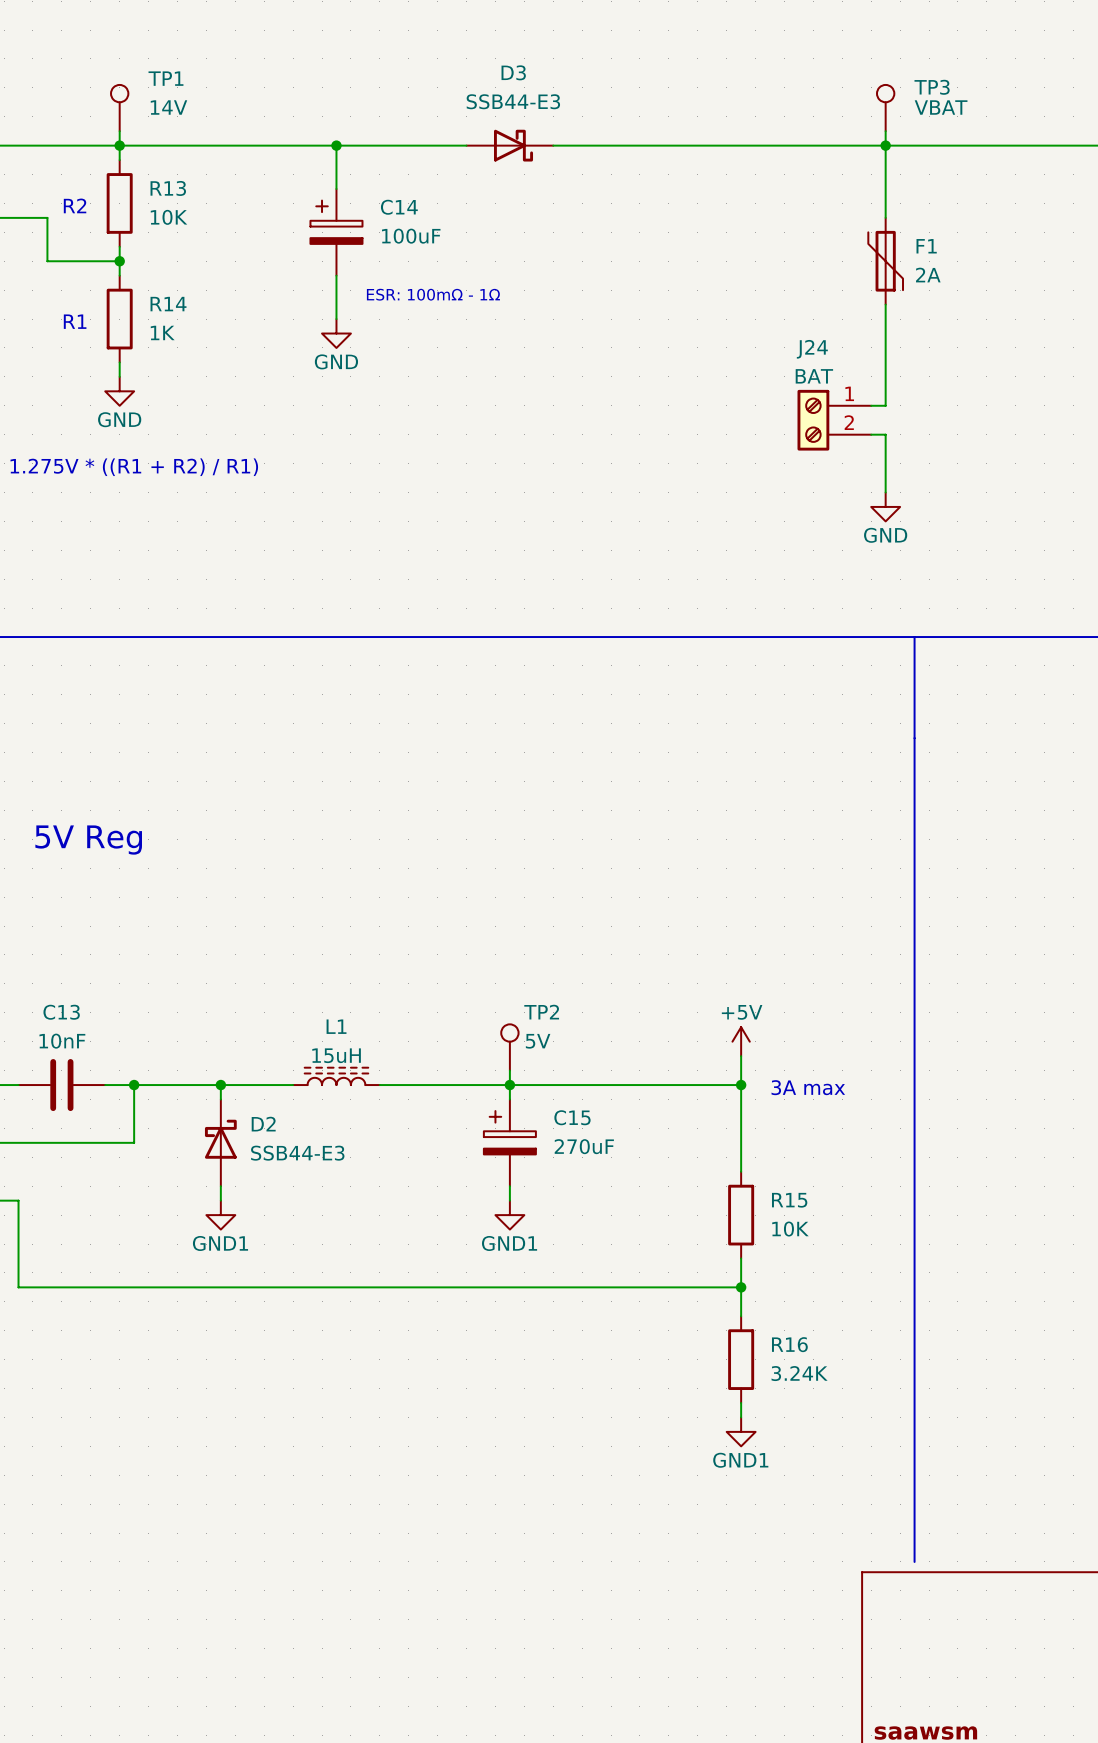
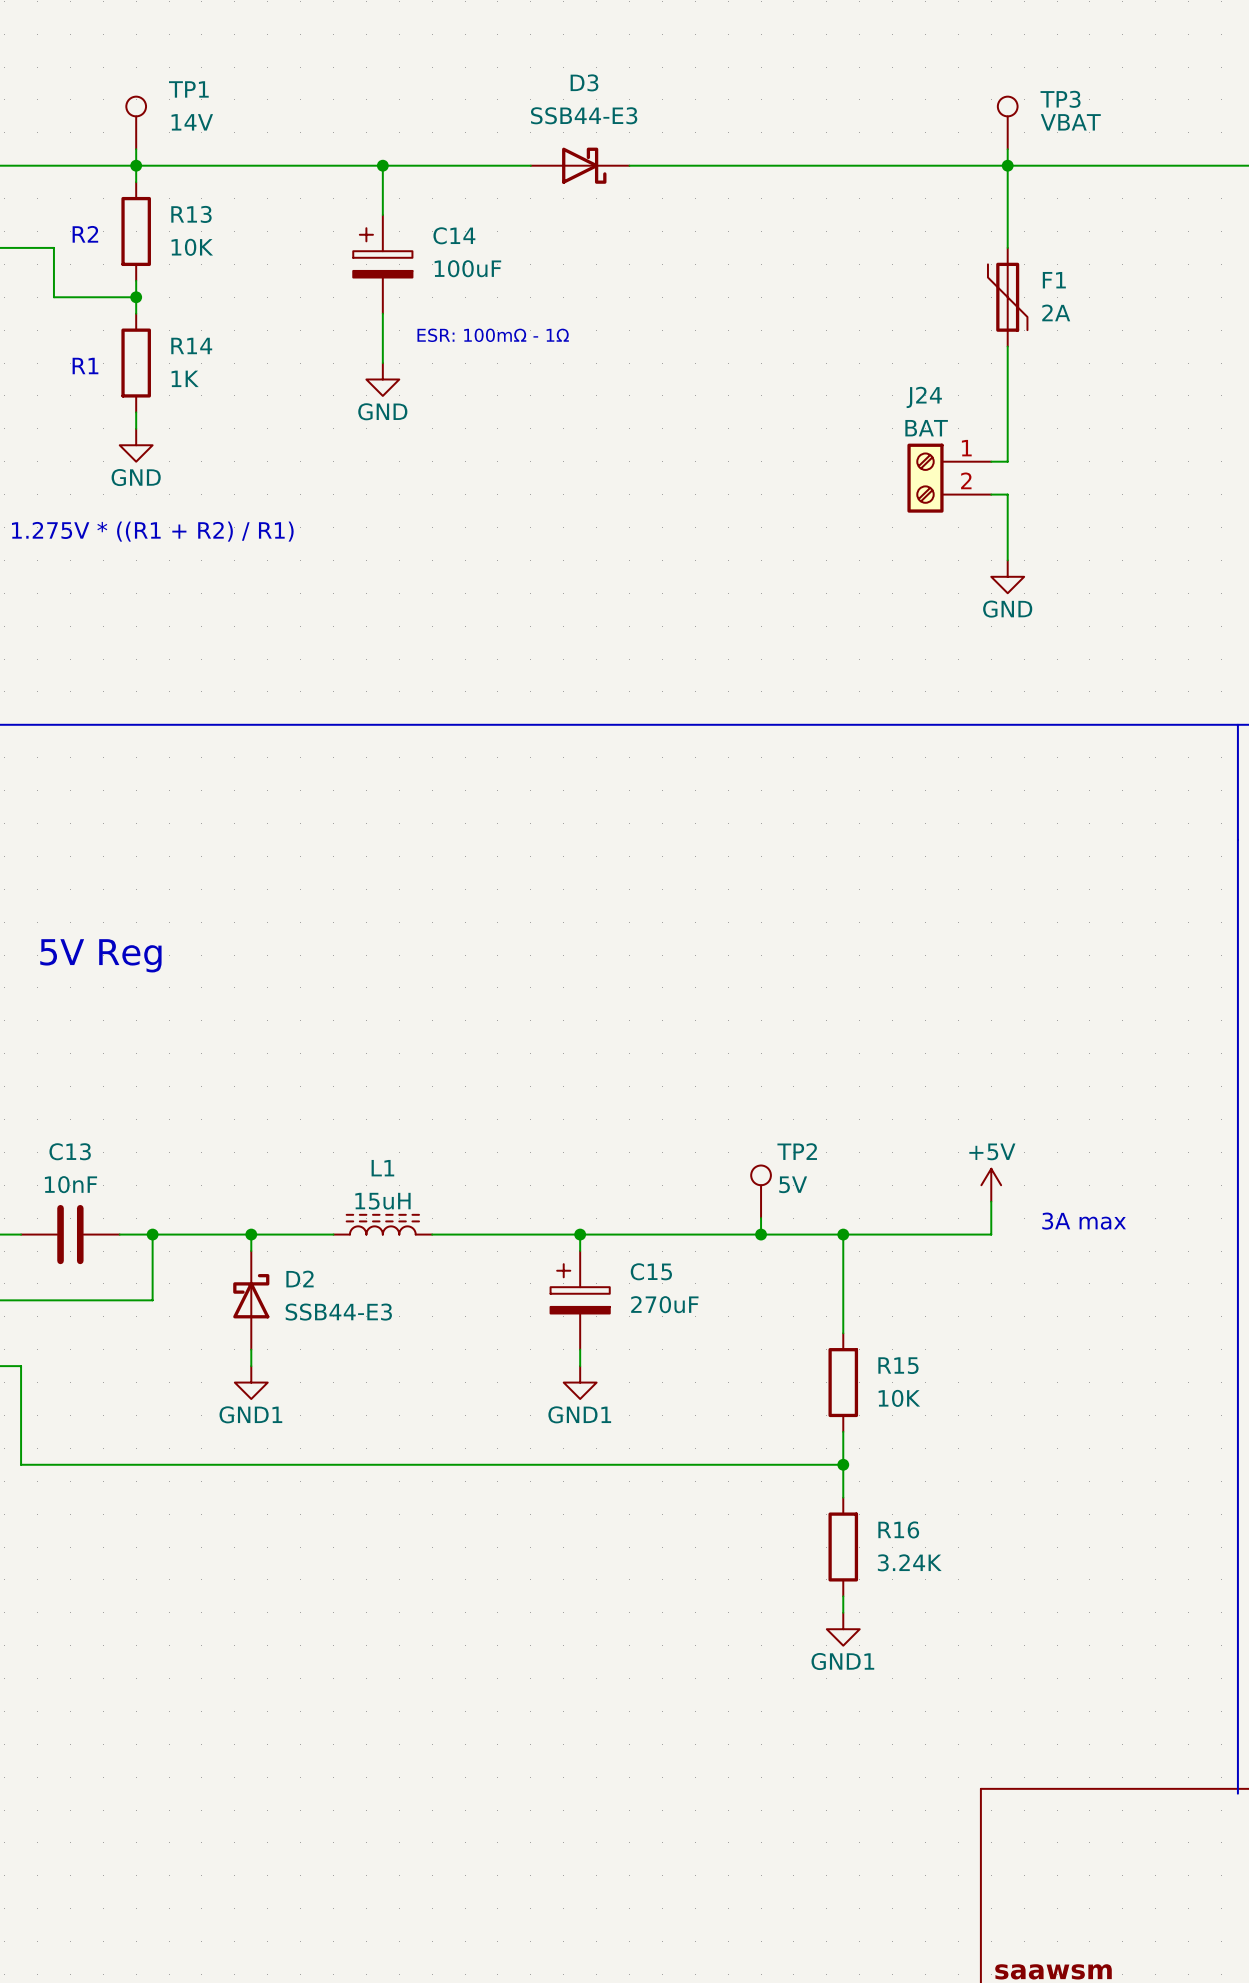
line: (914, 637) (914, 1561) -> none
line: none -> (1237, 724) (1237, 1793)
power symbol: +5V (741, 1041) -> none
power symbol: none -> +5V (991, 1185)
TP2 position: (509, 1047) -> (761, 1191)
wire: (741, 1056) (741, 1085) -> (991, 1201) (991, 1234) (843, 1234)
wire: (509, 1070) (509, 1085) -> (761, 1218) (761, 1234)
junction: none -> (761, 1234)
text position: 3A max (808, 1087) -> 3A max (1084, 1221)

